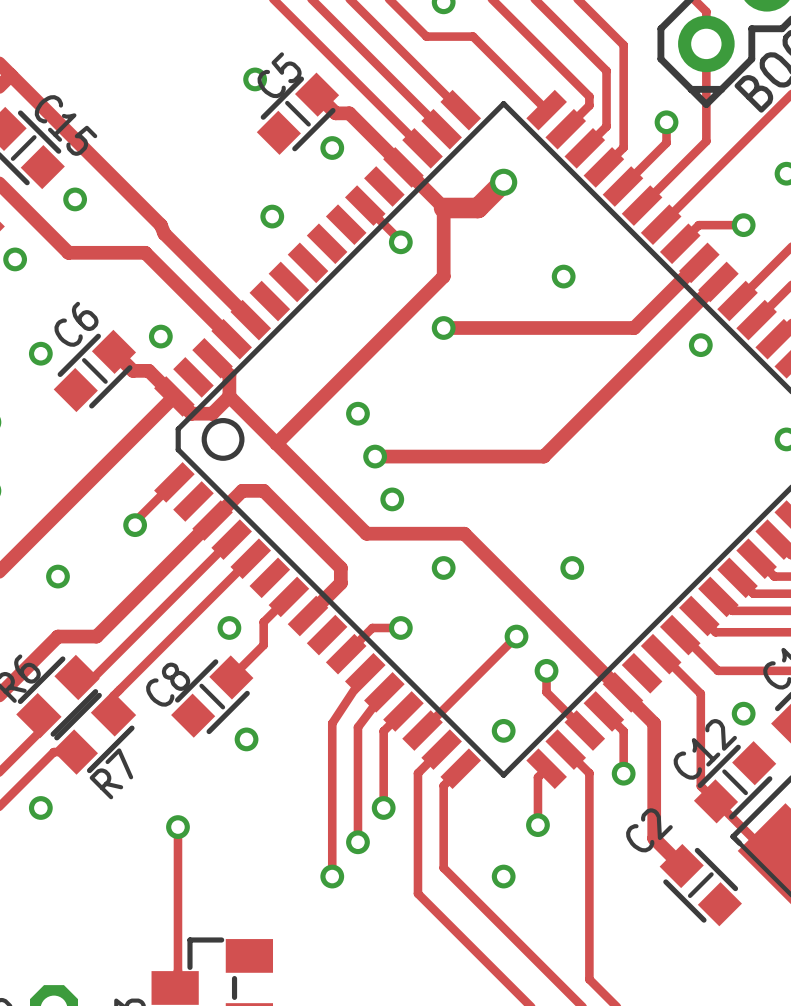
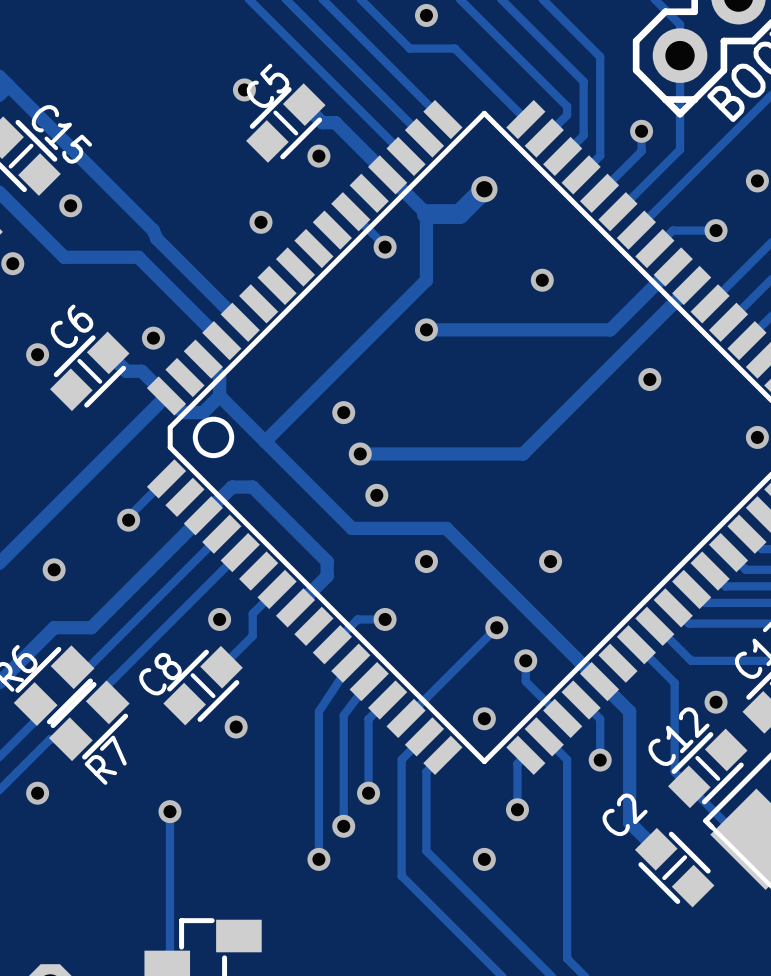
via position: (700, 345) -> (649, 379)

